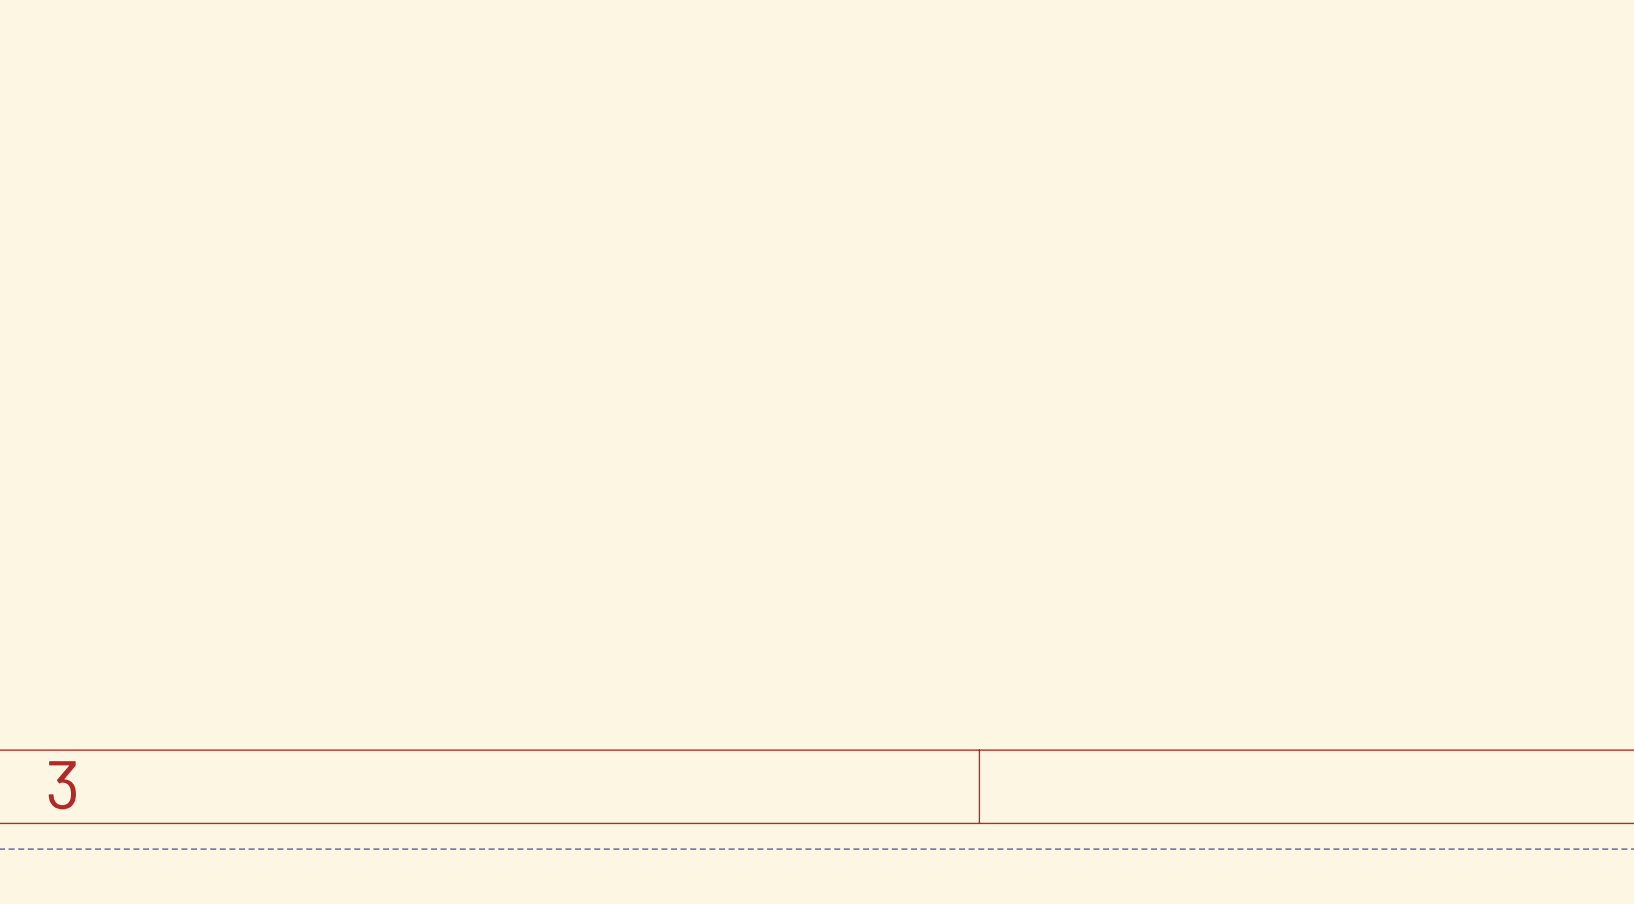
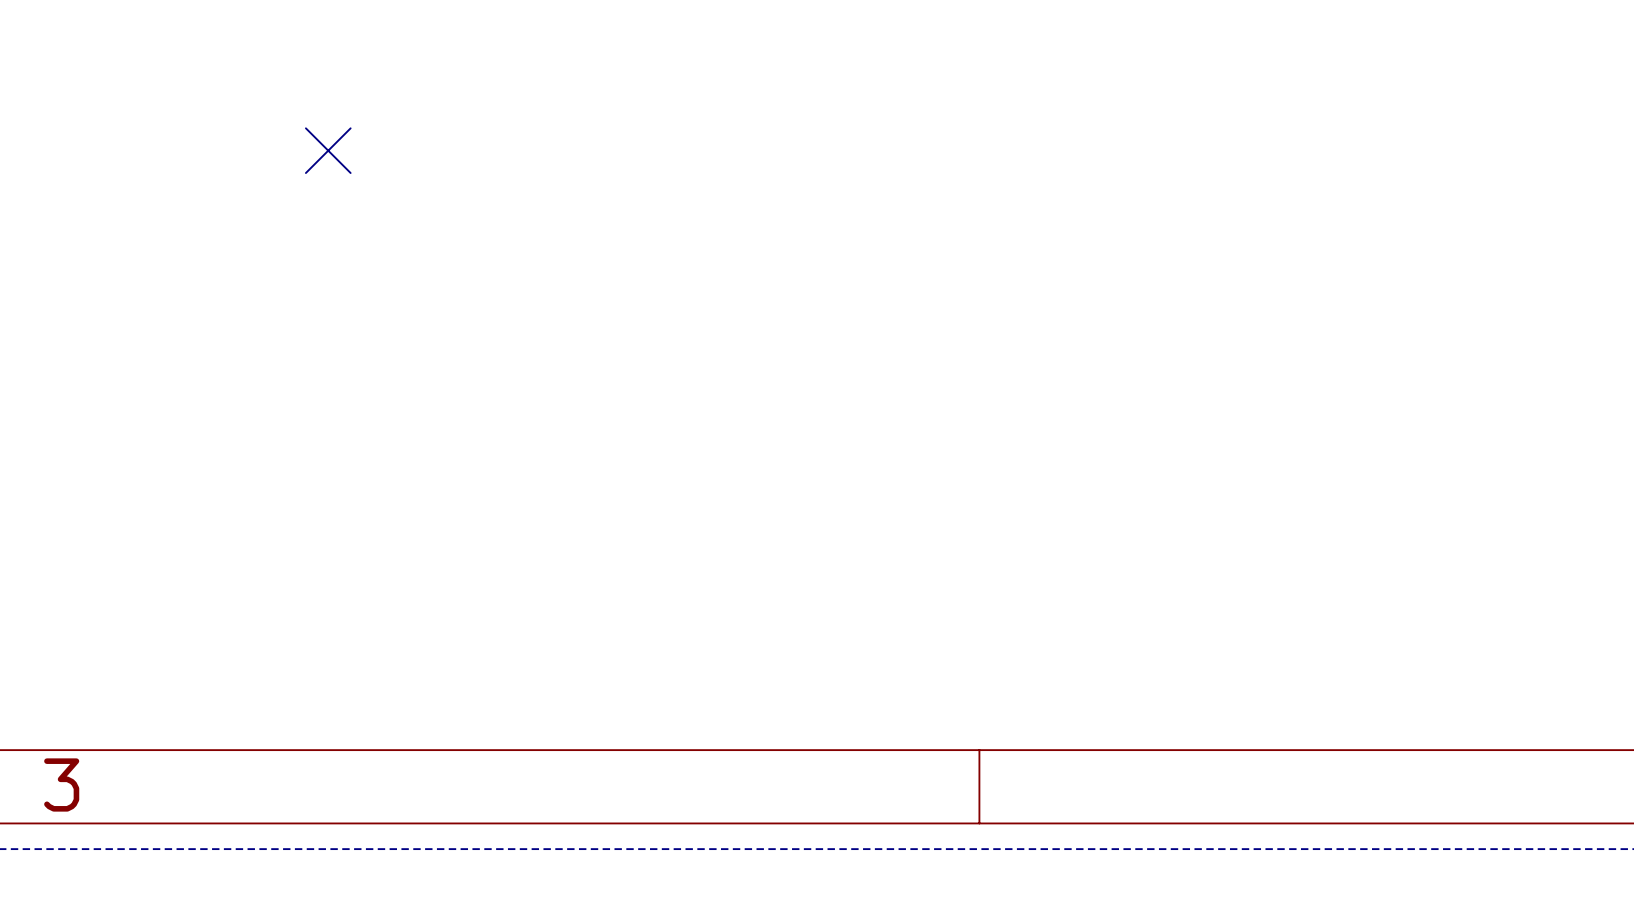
no-connect mark: none -> (328, 150)

